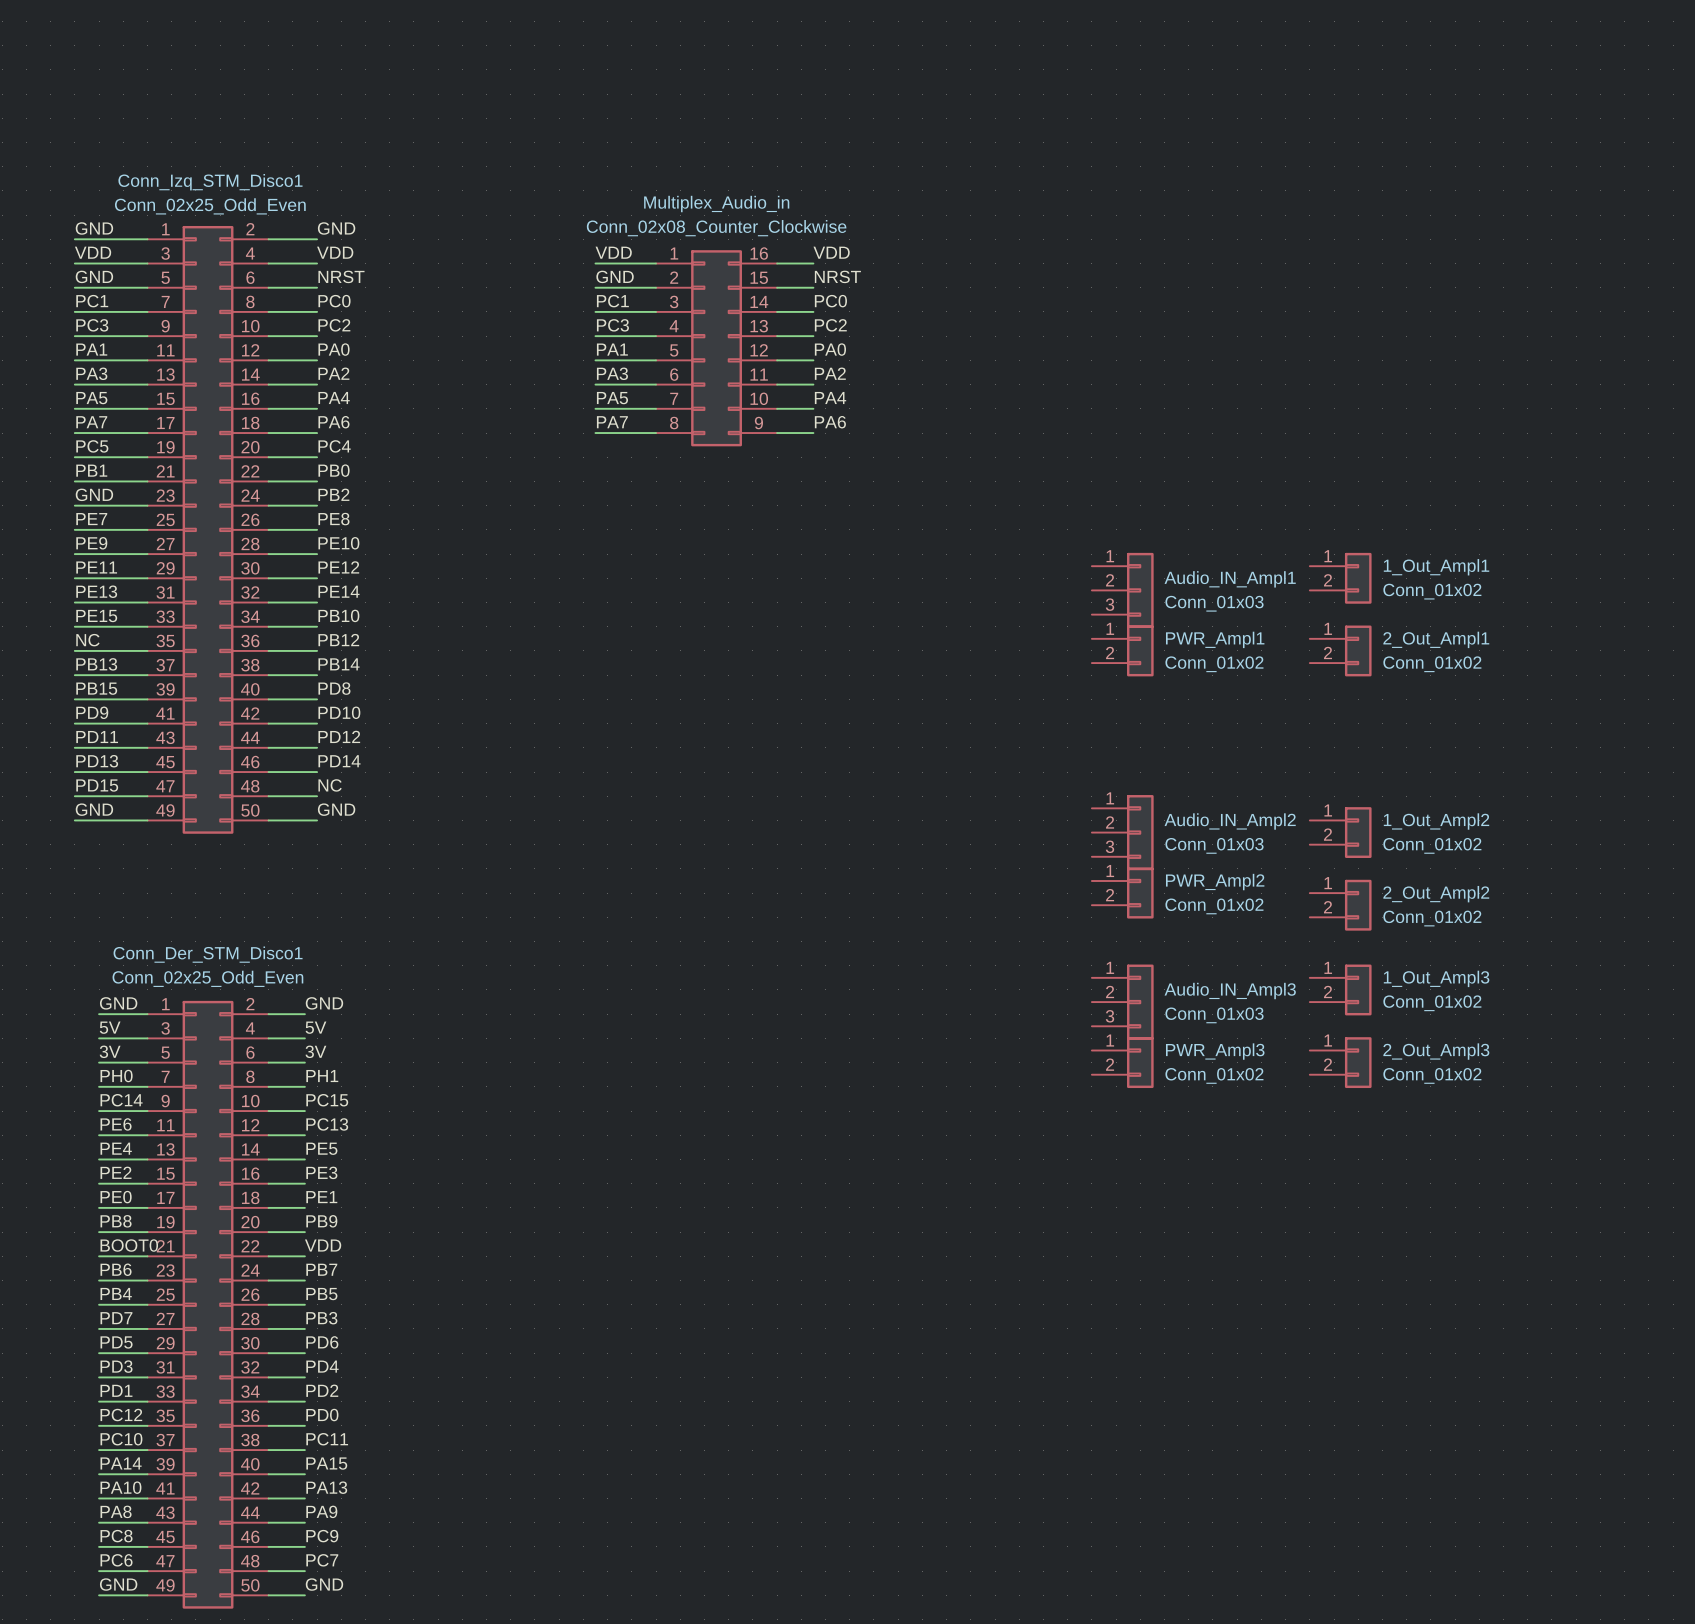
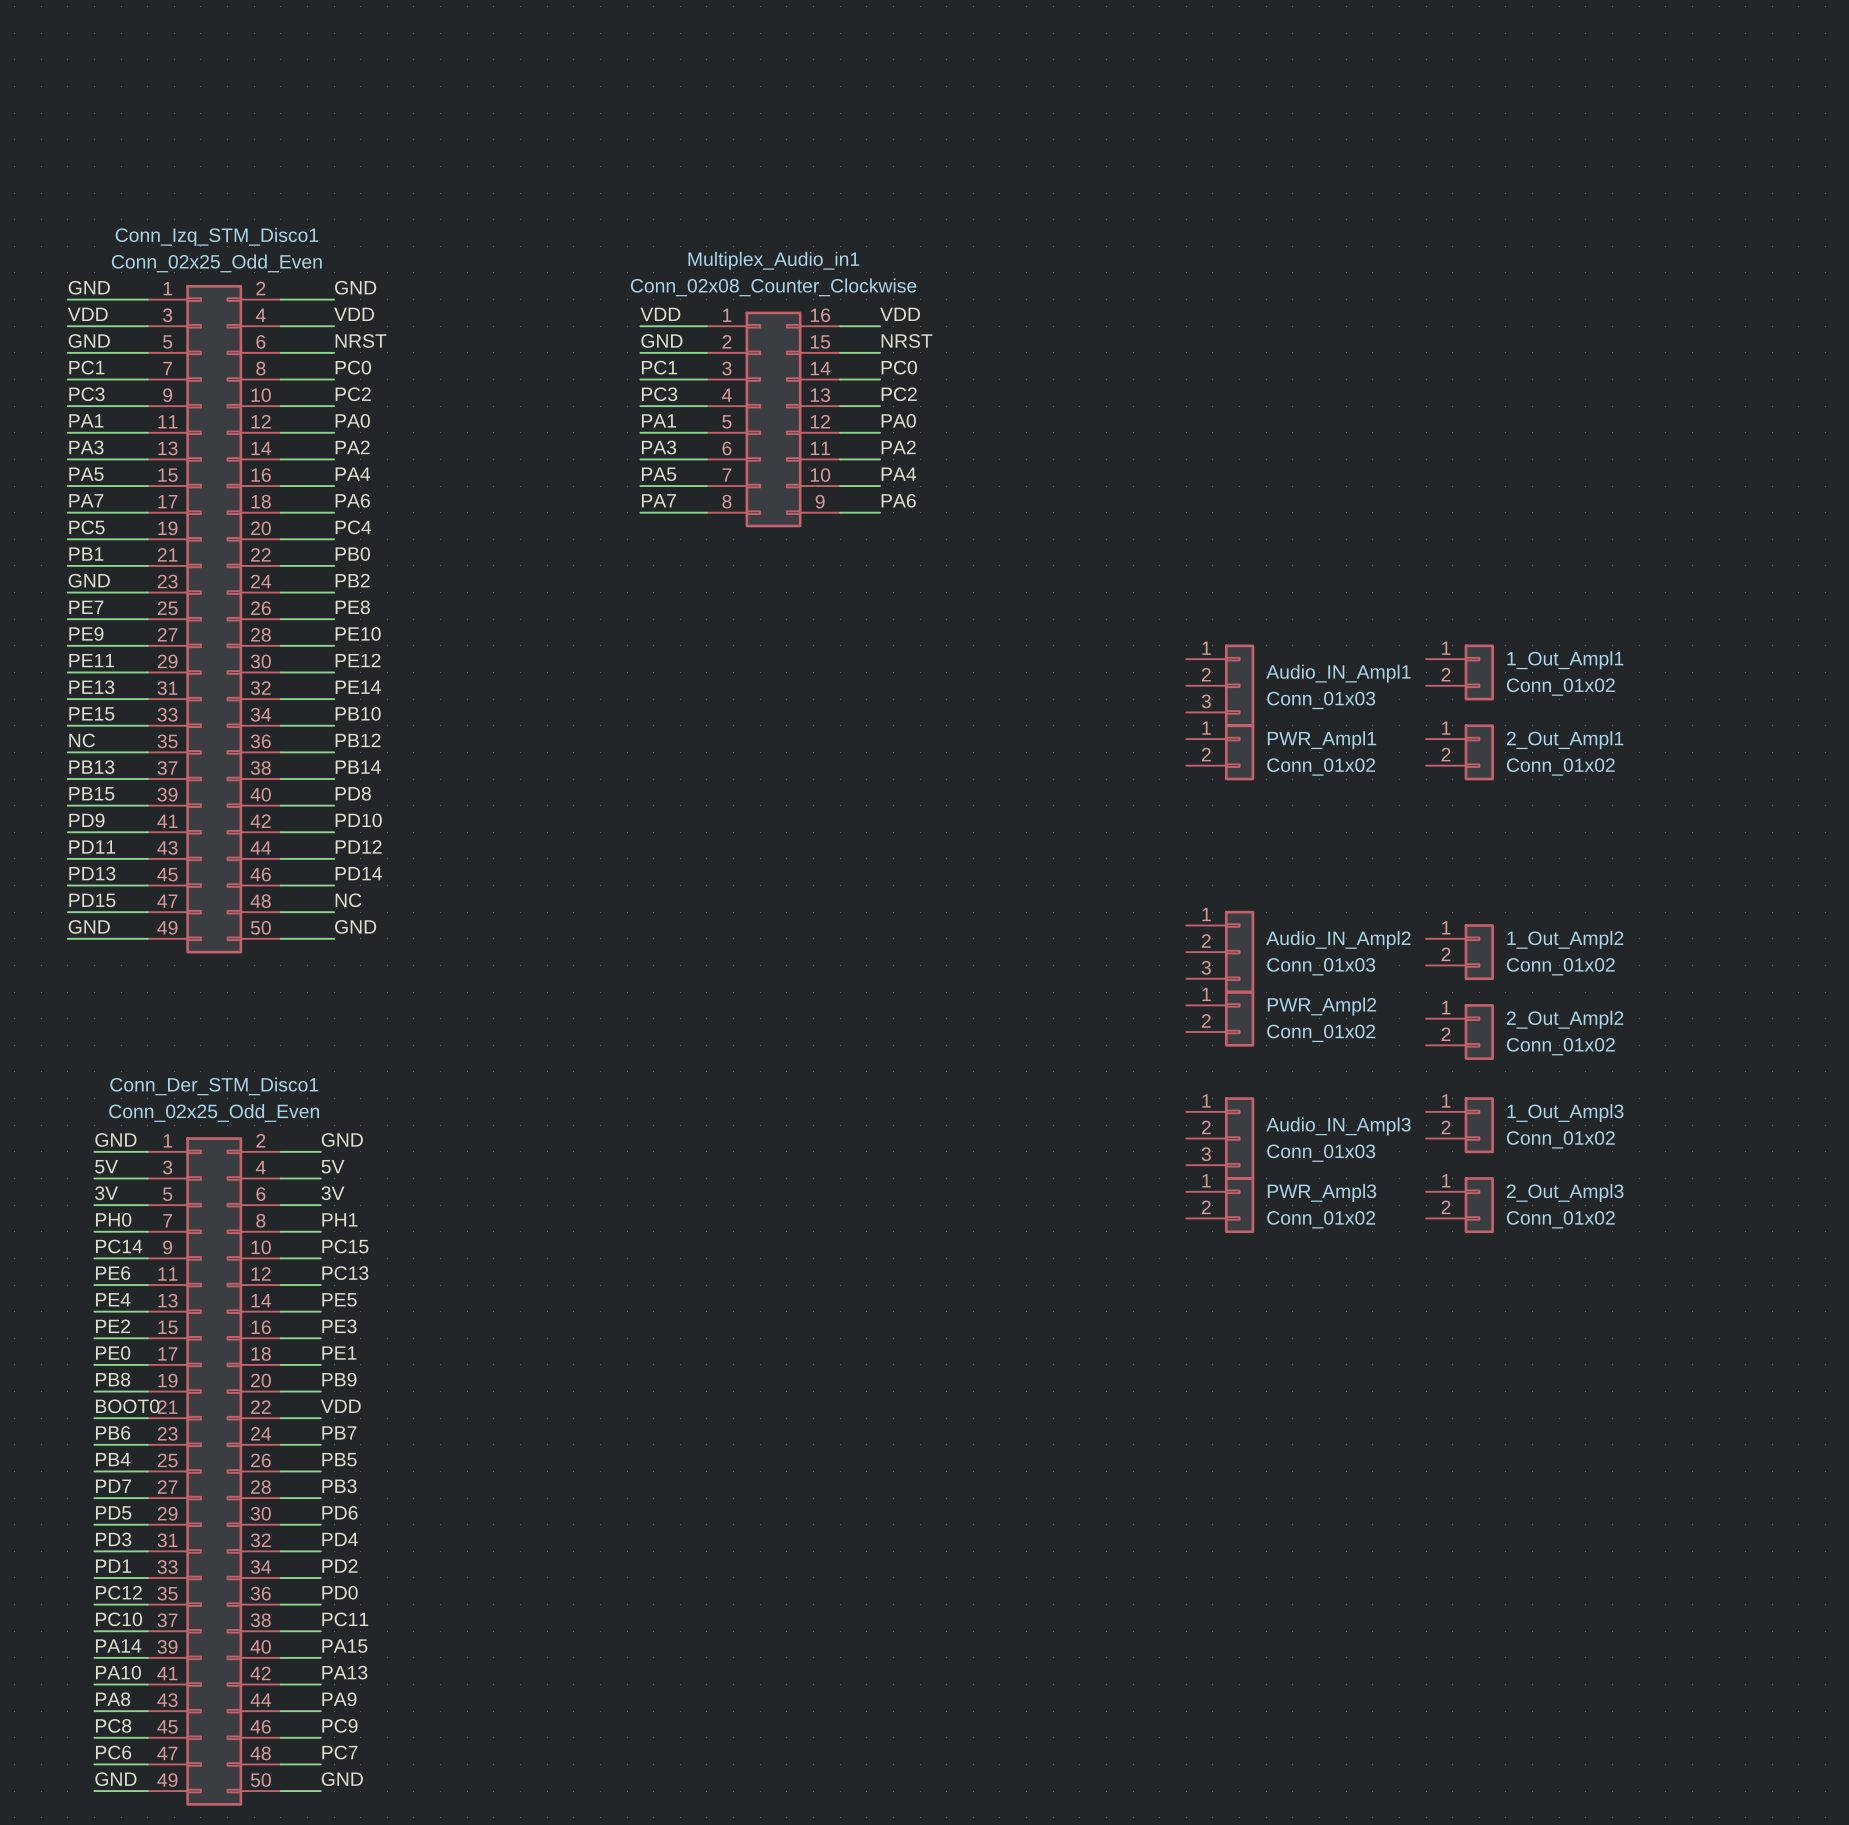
Multiplex_Audio_in name: Multiplex_Audio_in (716, 204) -> Multiplex_Audio_in1 (773, 260)

